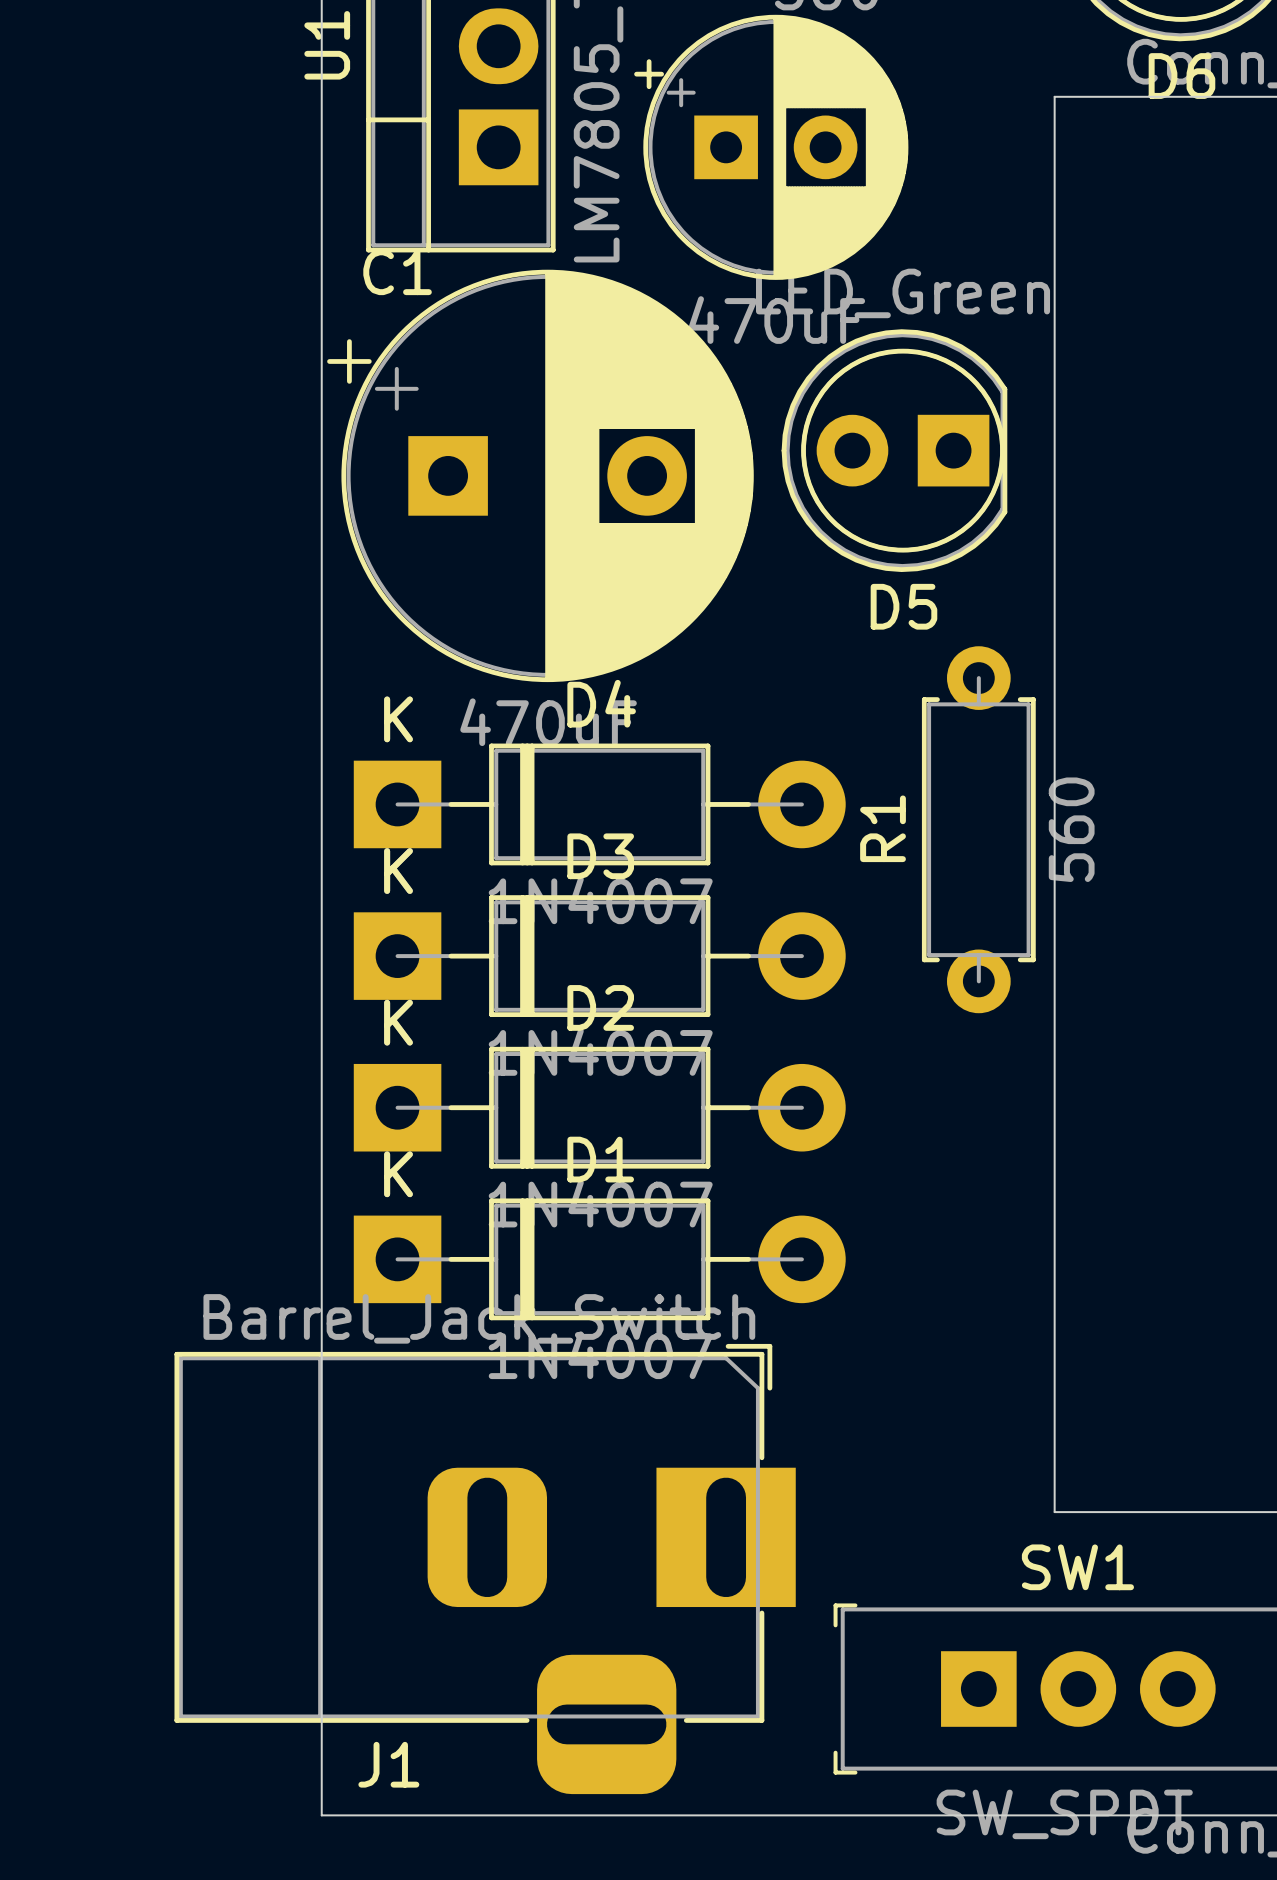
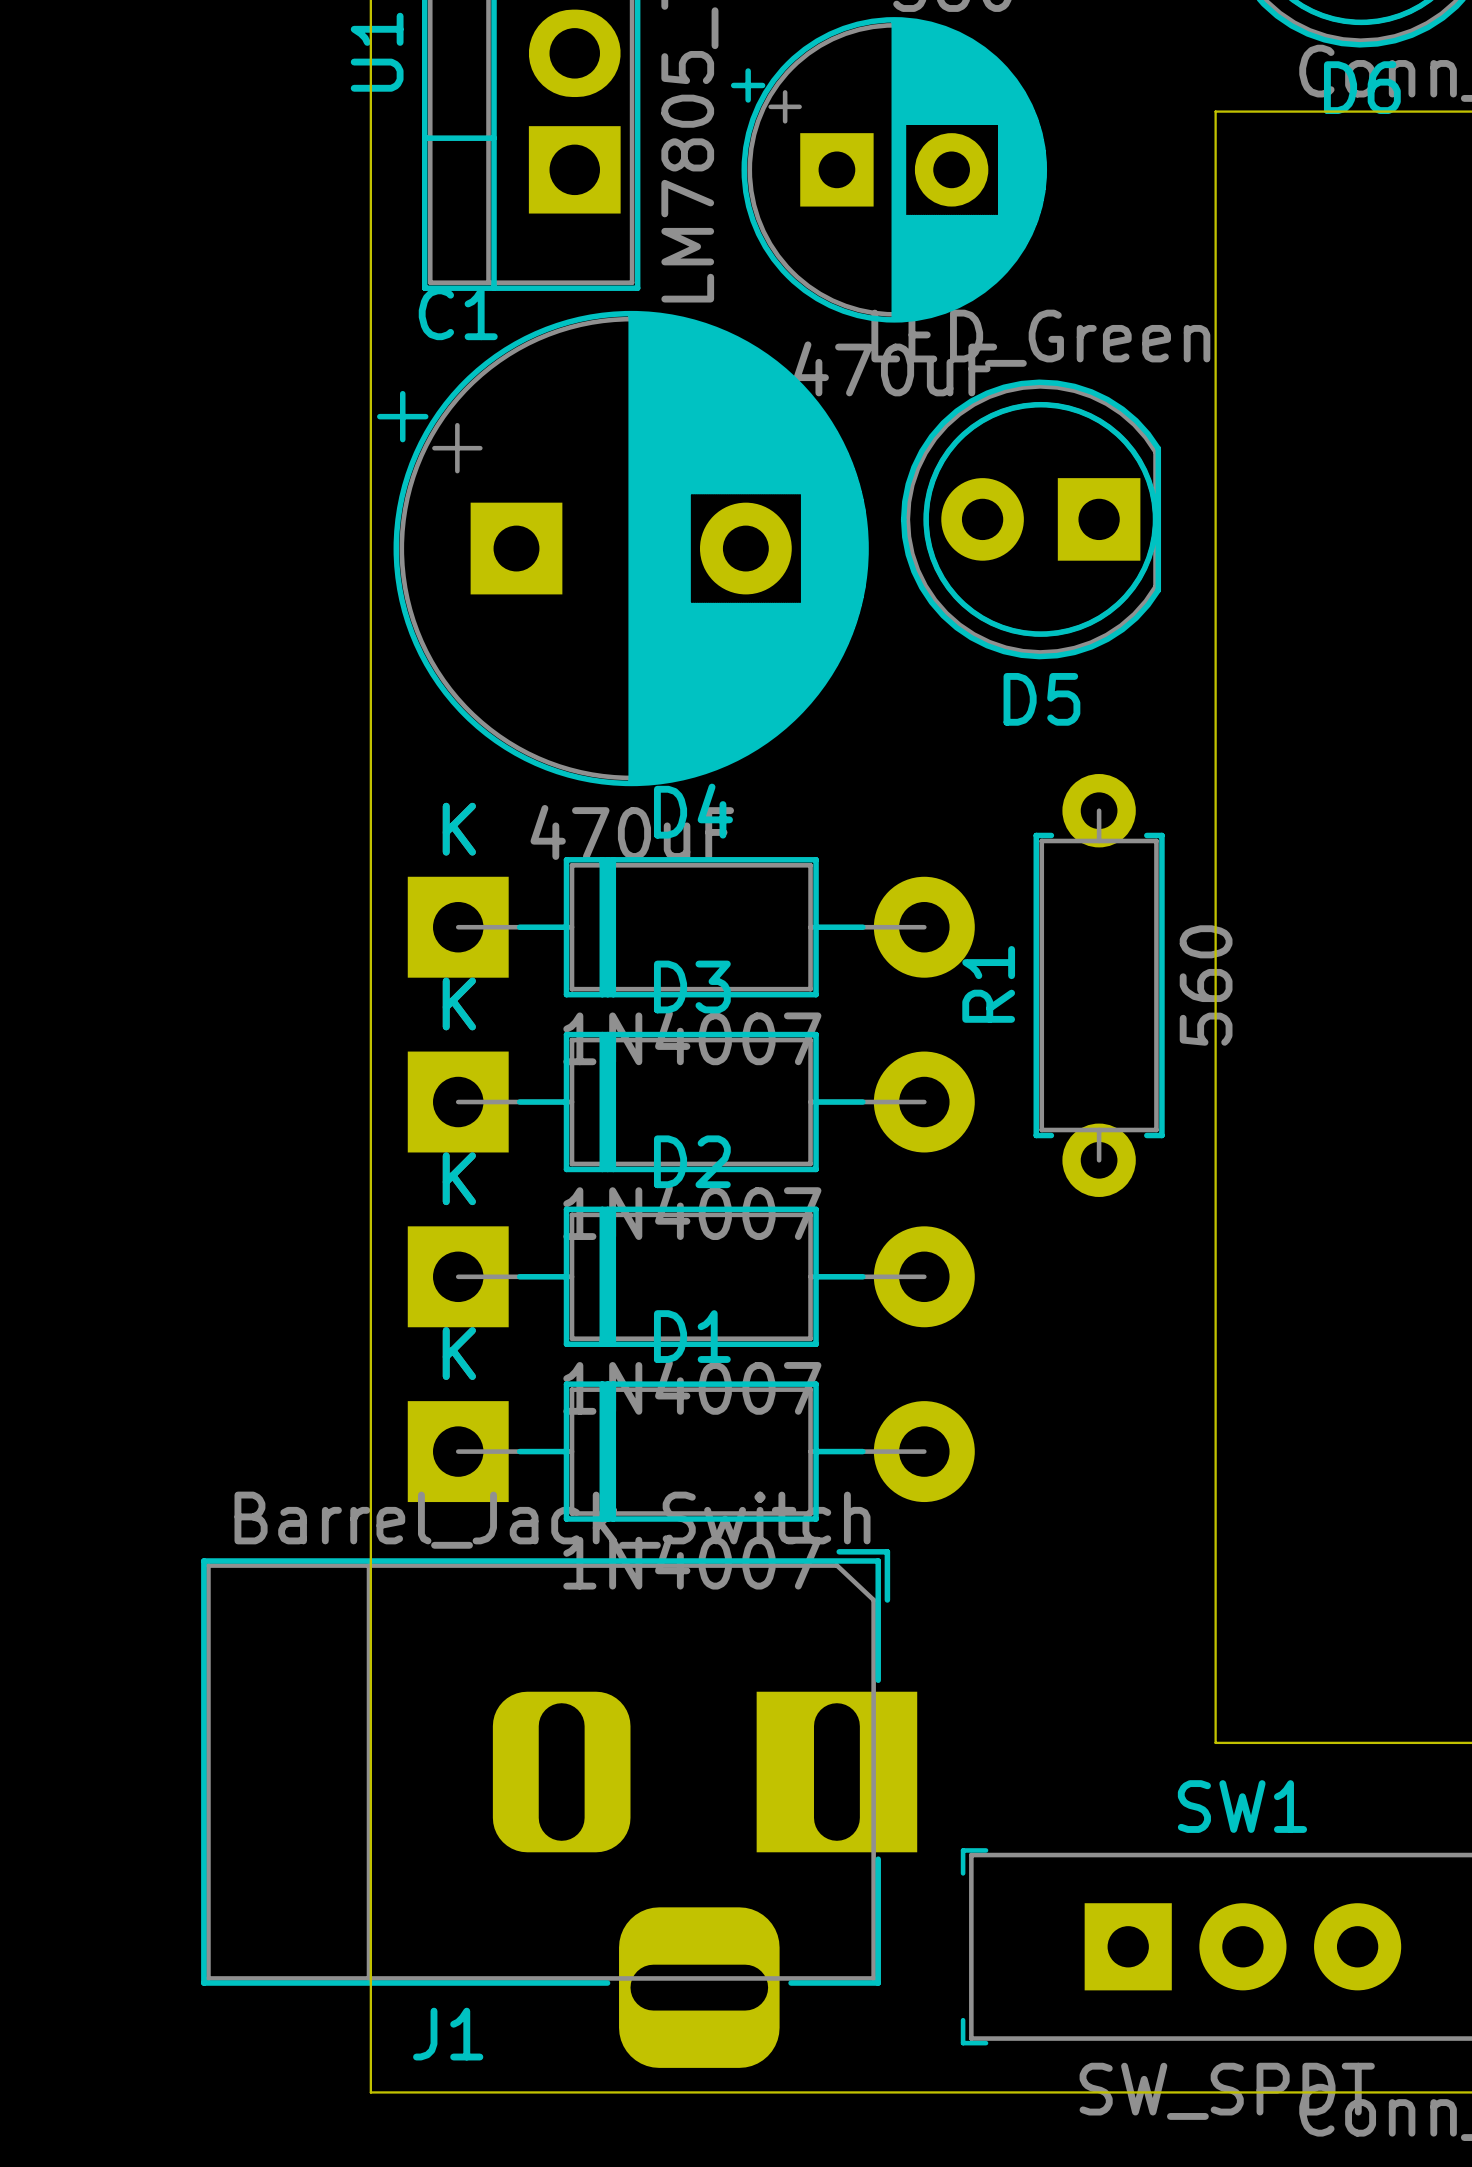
R1 position: (978, 829) -> (1099, 985)

